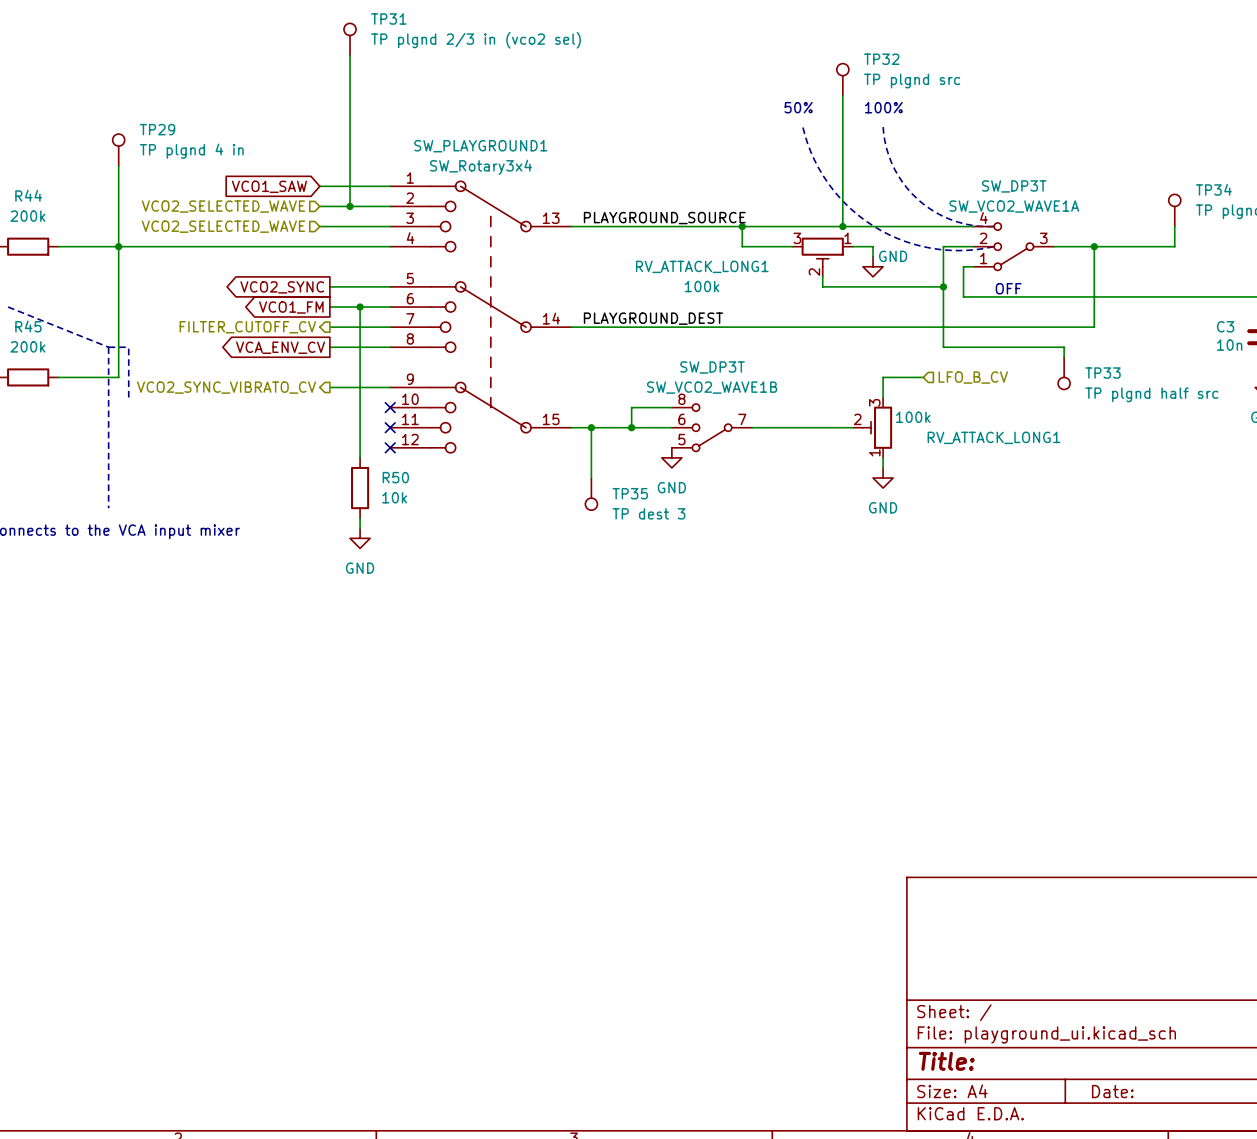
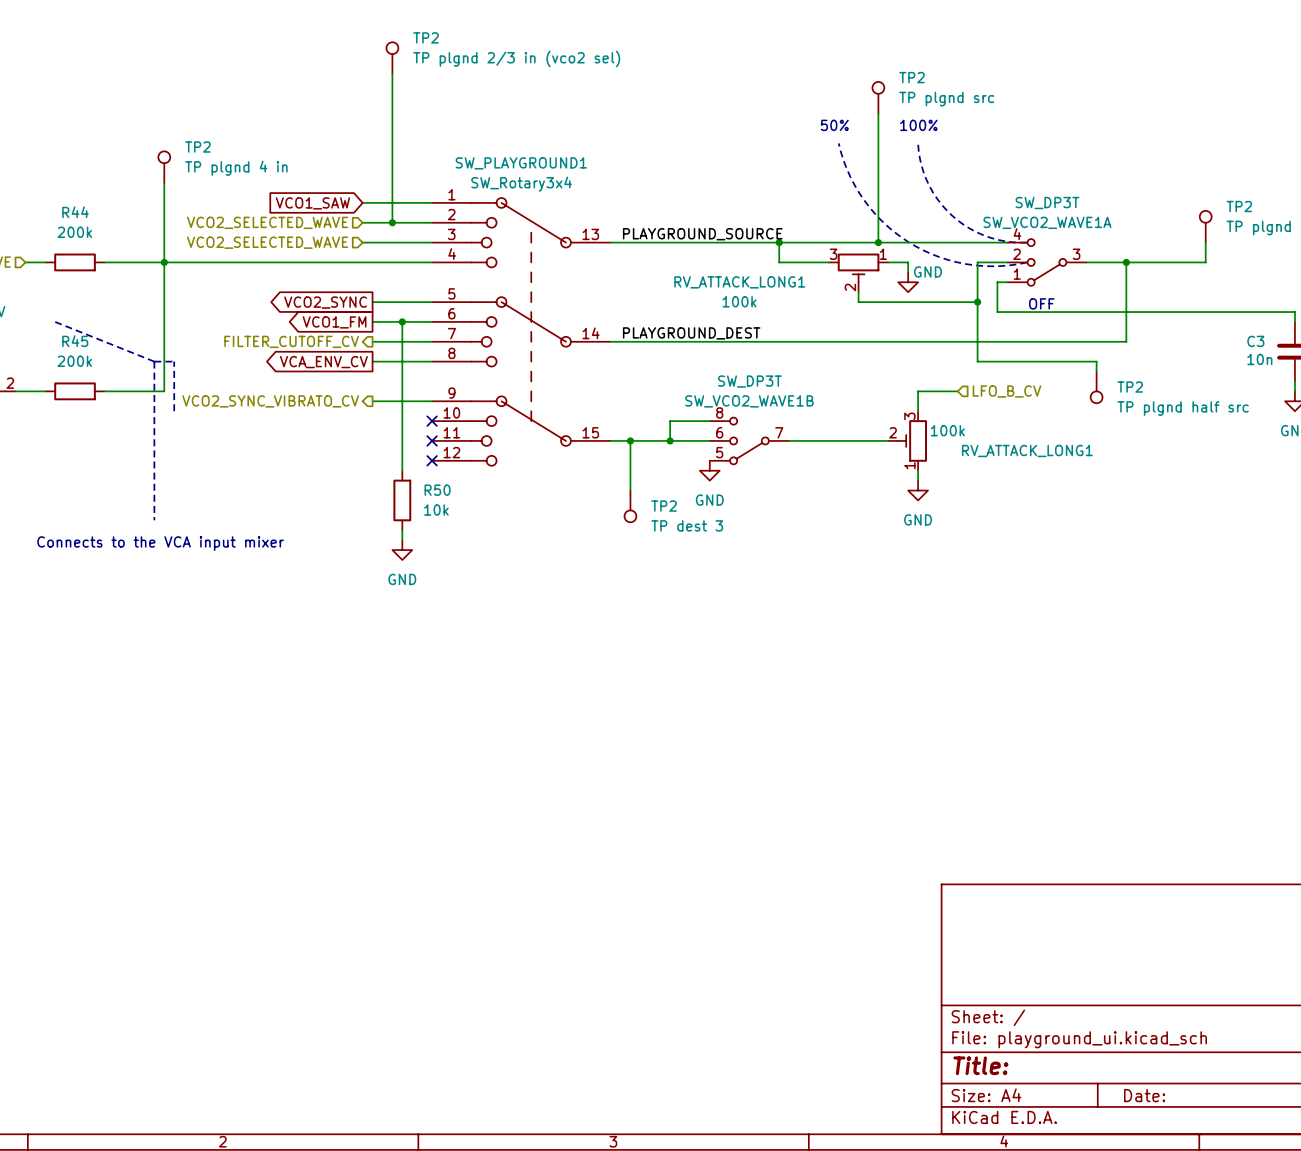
TP31 name: TP31 (388, 18) -> TP2 (426, 37)
TP32 name: TP32 (881, 59) -> TP2 (912, 77)
TP29 name: TP29 (157, 129) -> TP2 (197, 147)
TP34 name: TP34 (1213, 189) -> TP2 (1239, 206)
TP33 name: TP33 (1102, 373) -> TP2 (1130, 387)
TP35 name: TP35 (630, 493) -> TP2 (664, 506)

